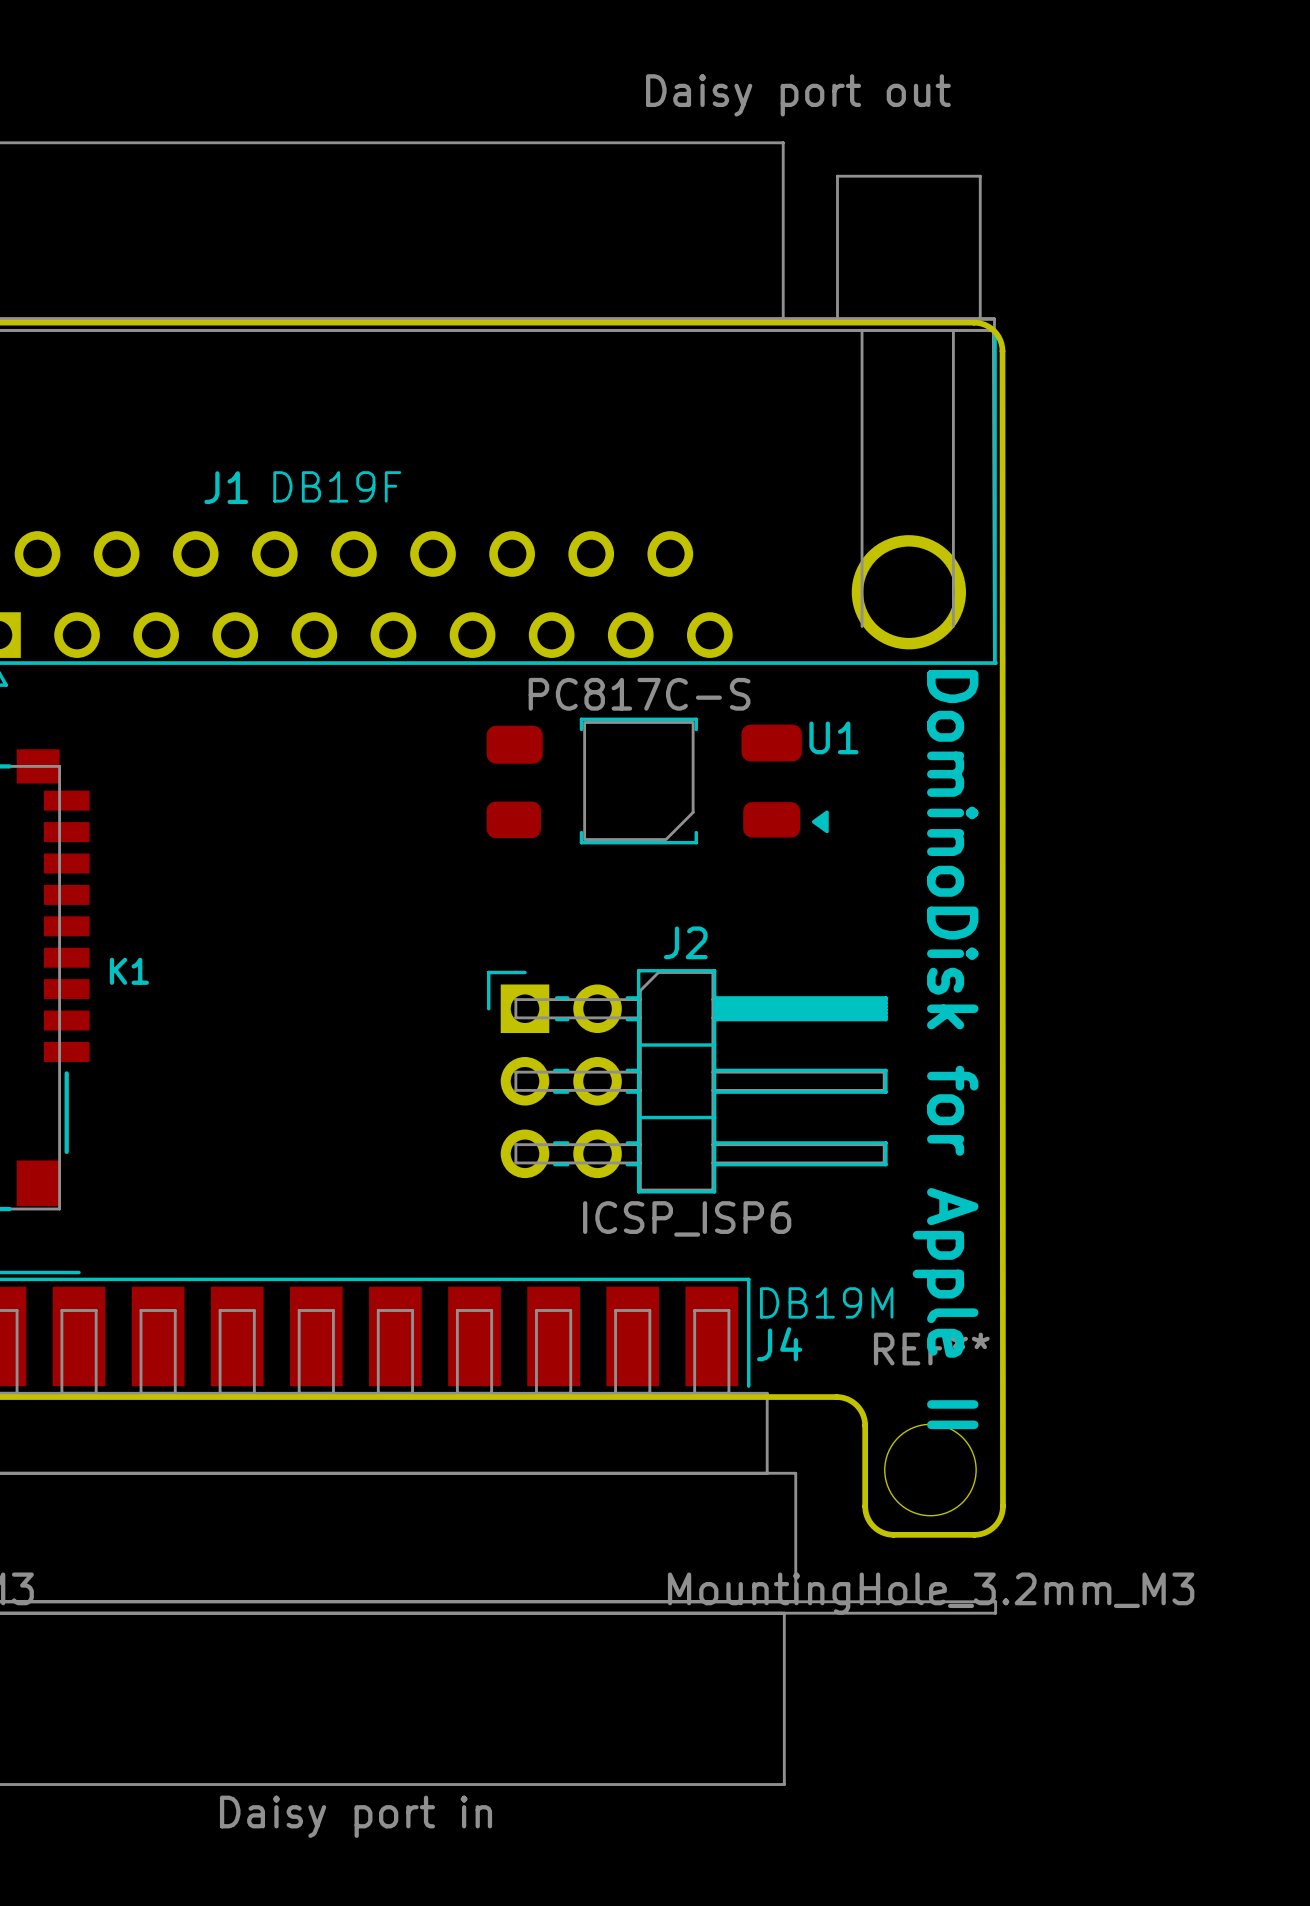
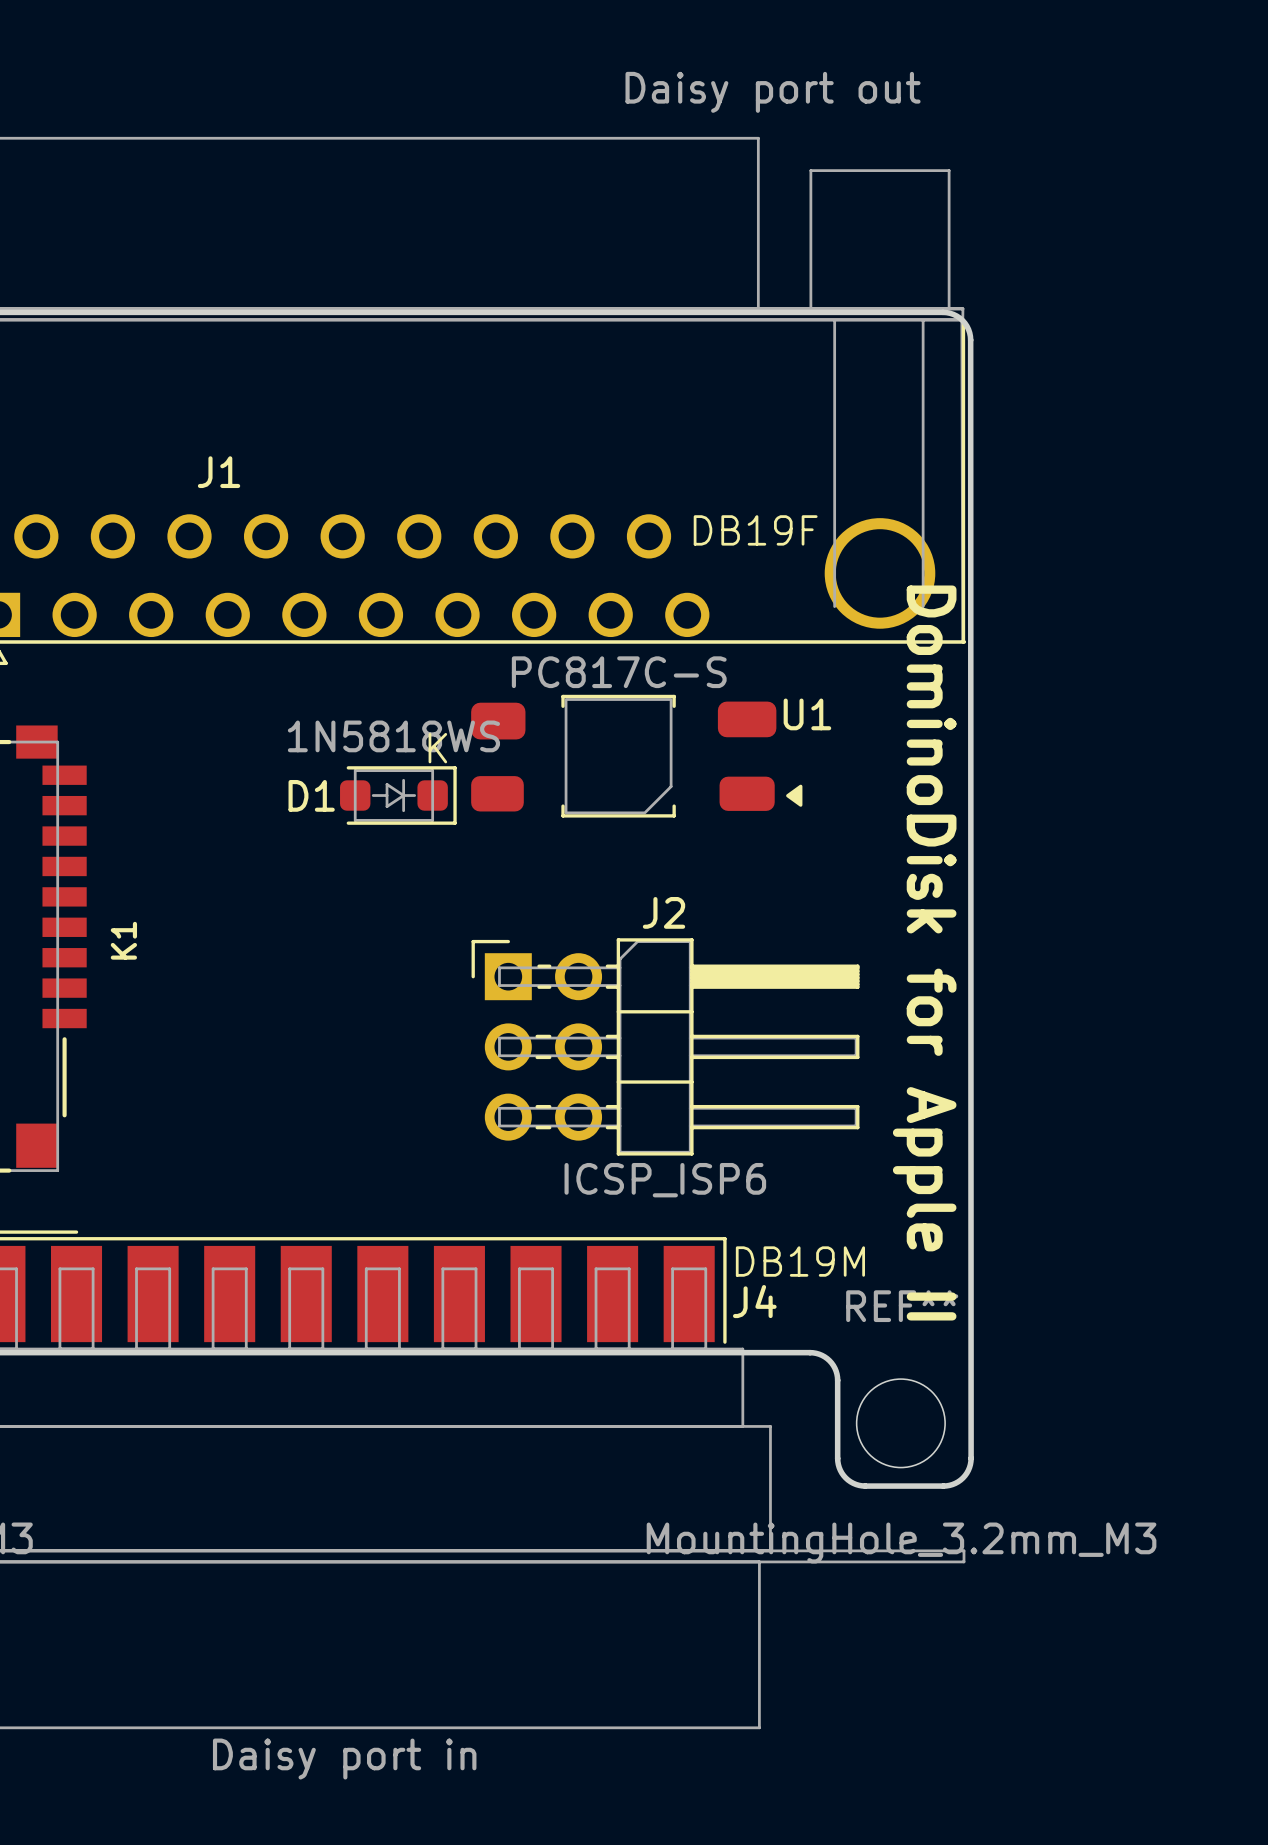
text position: DB19F (337, 486) -> DB19F (755, 530)
D1: none -> 1N5818WS (398, 795)
K1 name rotation: 0° (129, 971) -> 90° counterclockwise (123, 940)
text position: DominoDisk for Apple II (945, 1049) -> DominoDisk for Apple II (924, 953)

